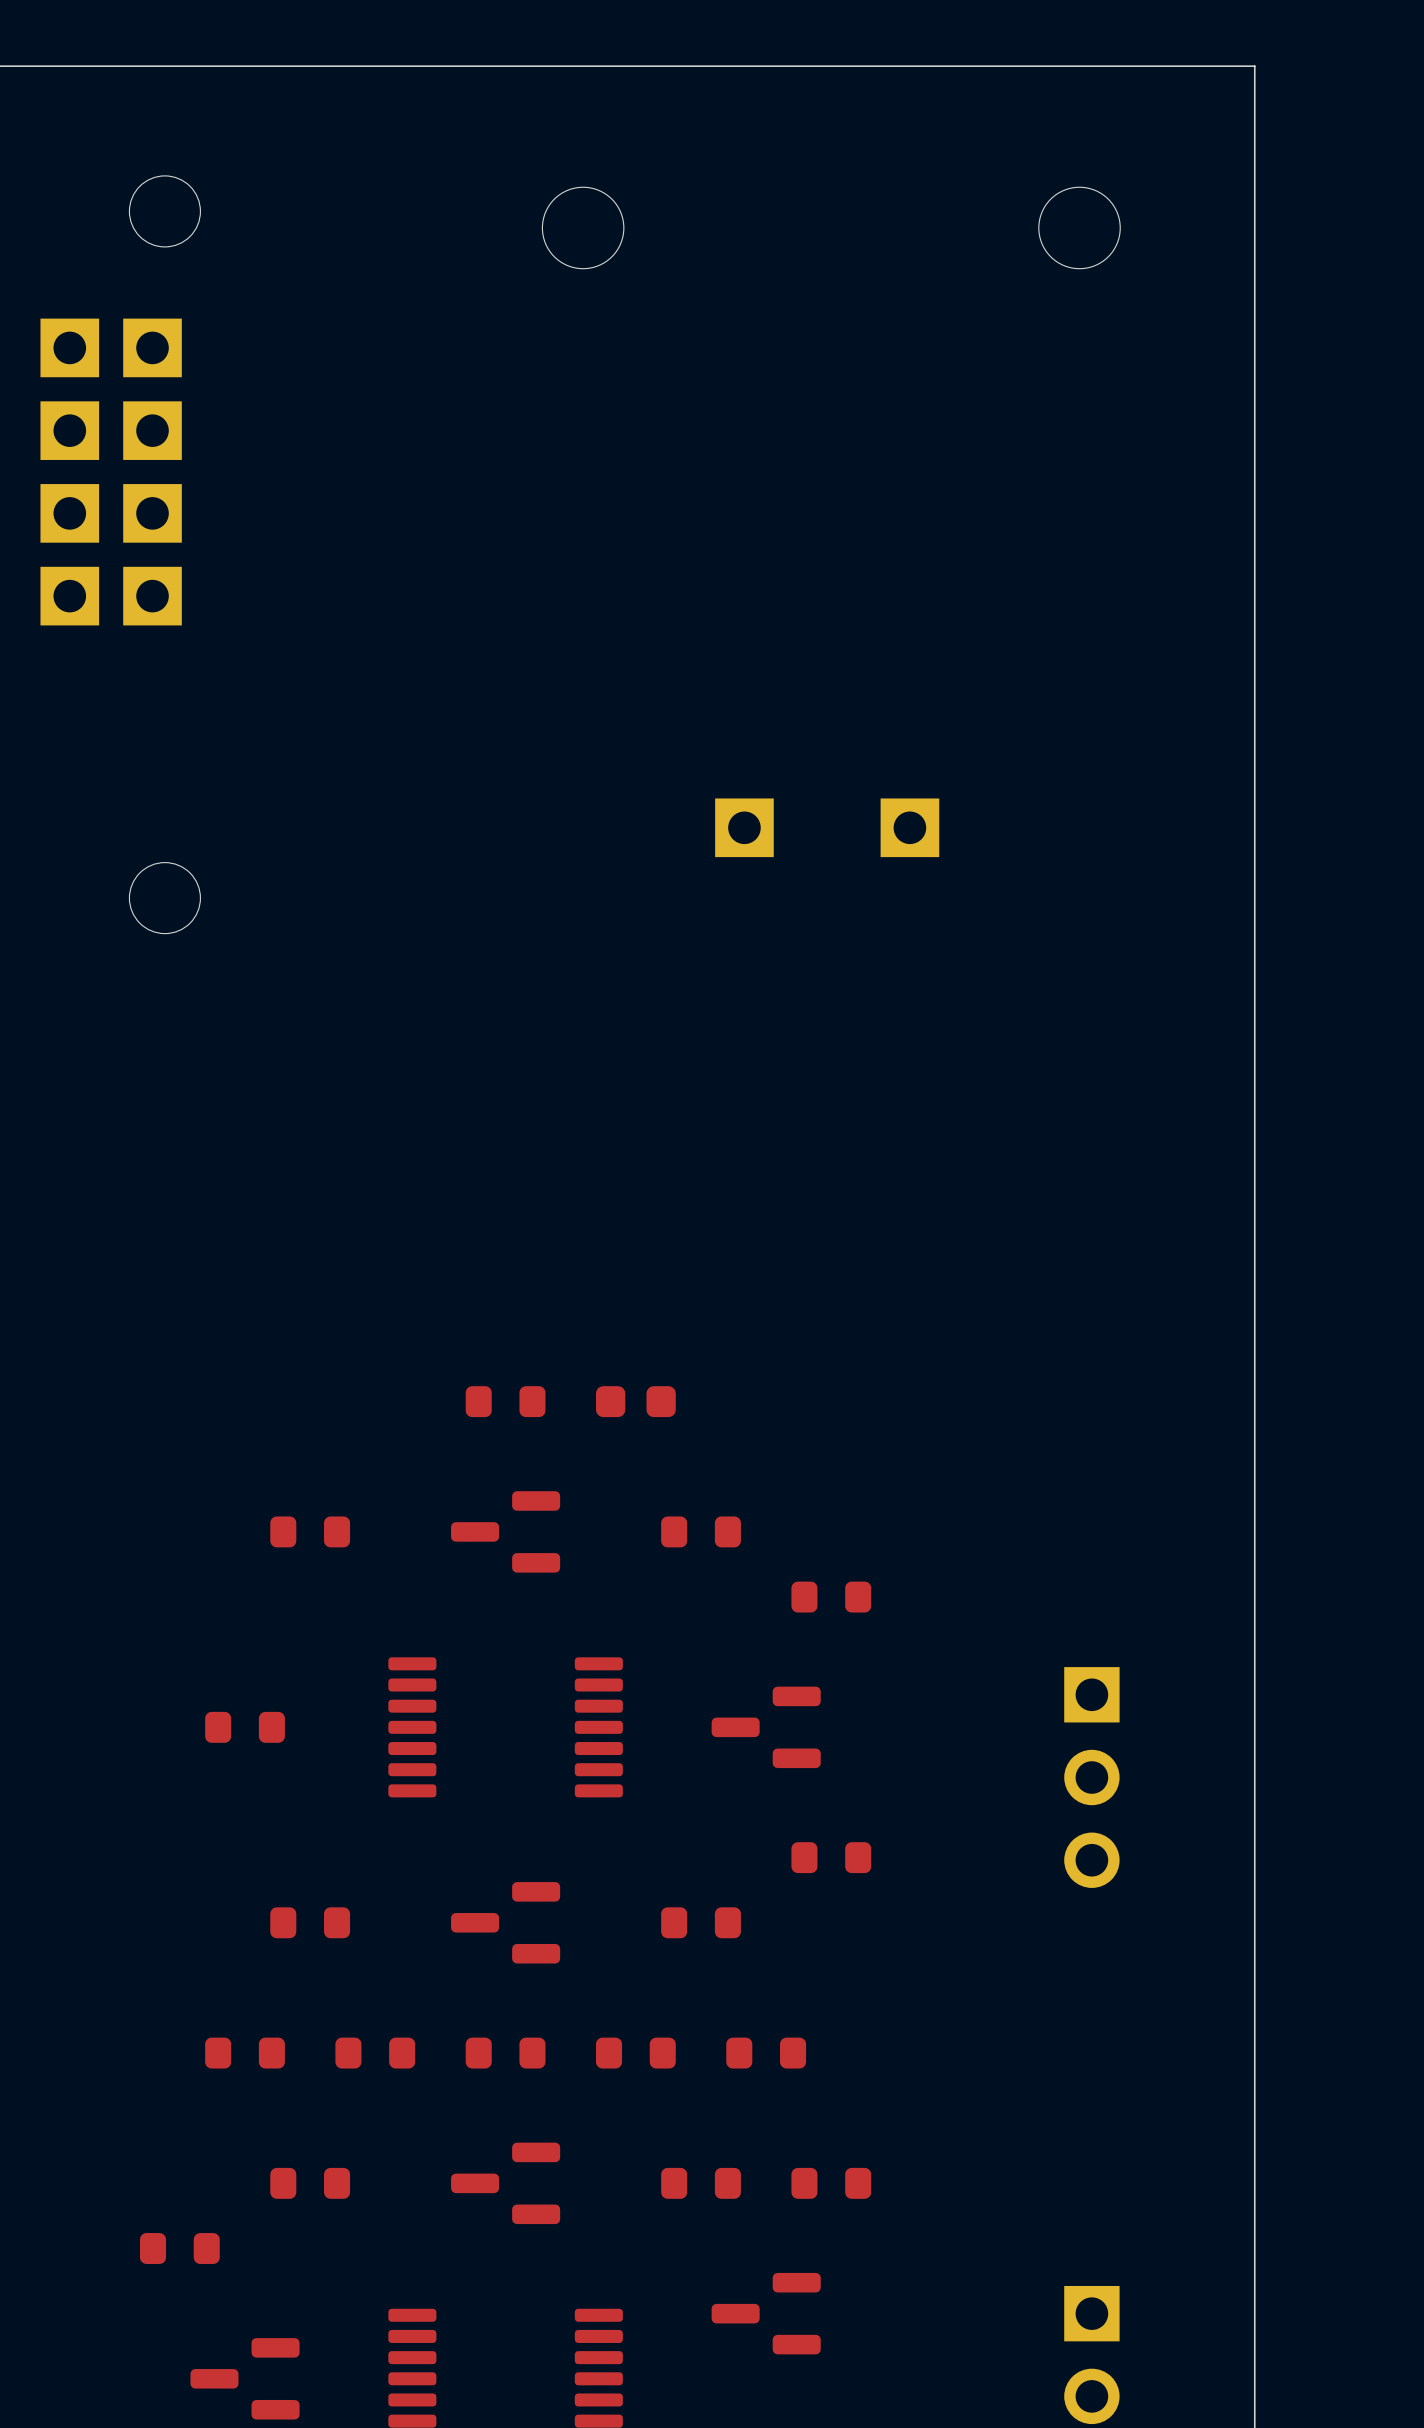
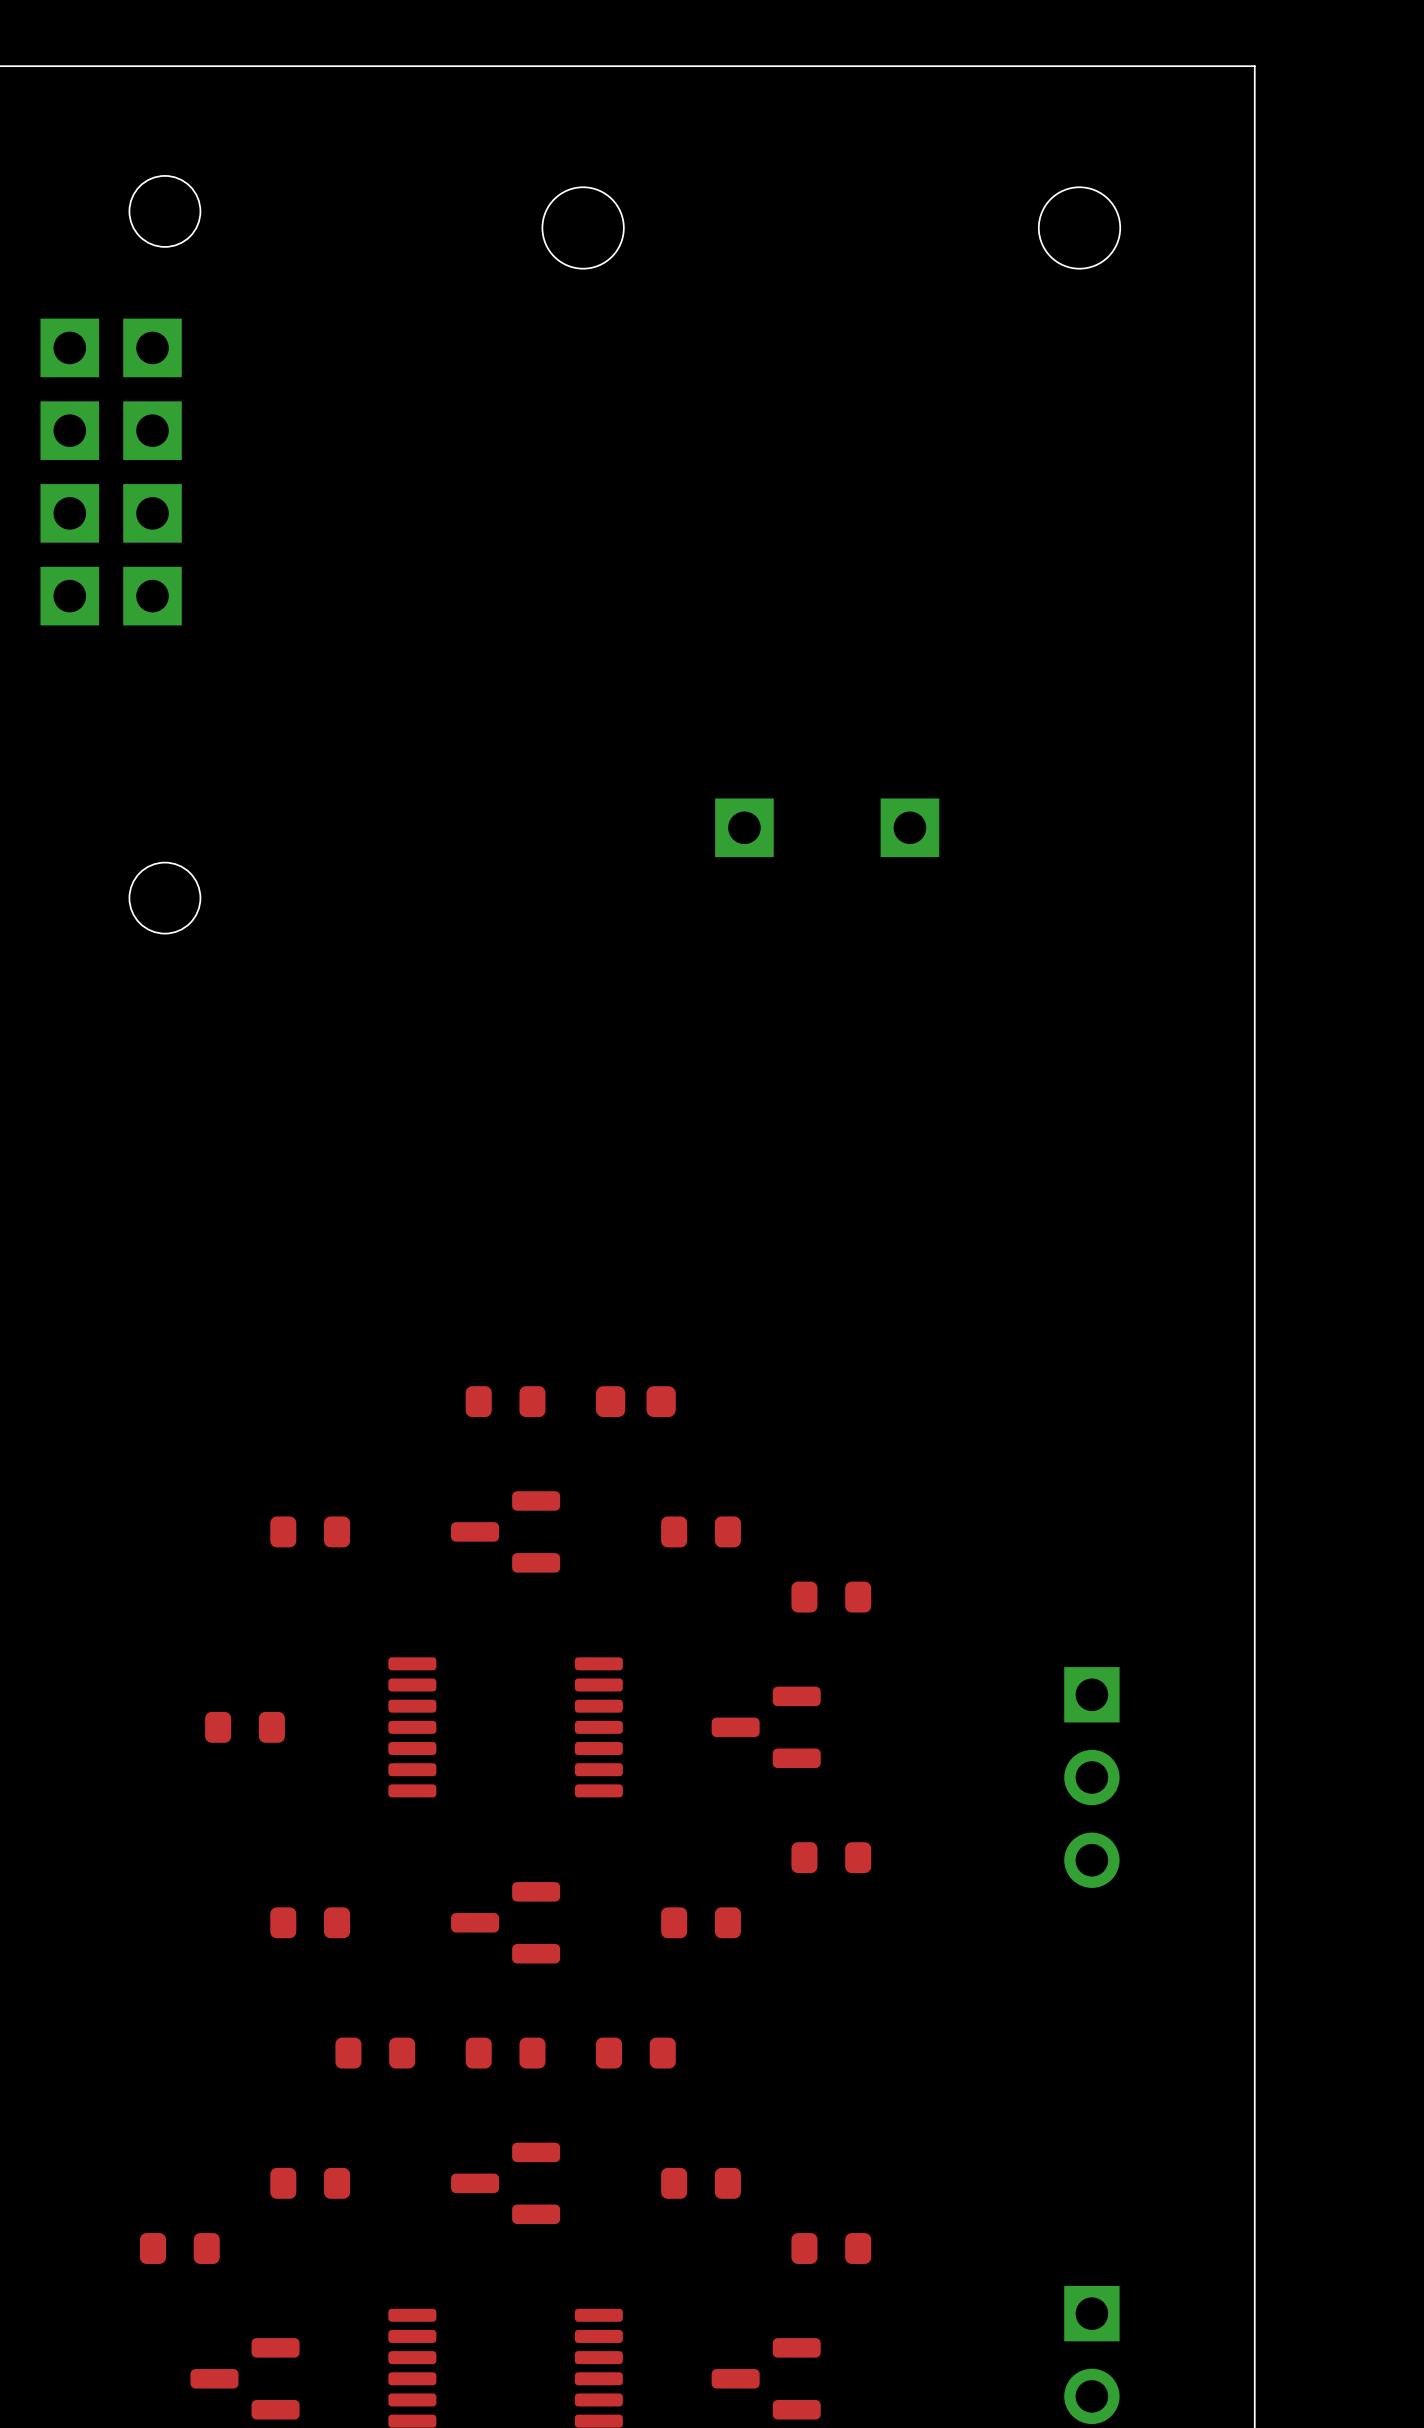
part: (245, 2053) -> none
part: (766, 2053) -> none
part position: (831, 2183) -> (831, 2248)
part position: (766, 2313) -> (766, 2378)

